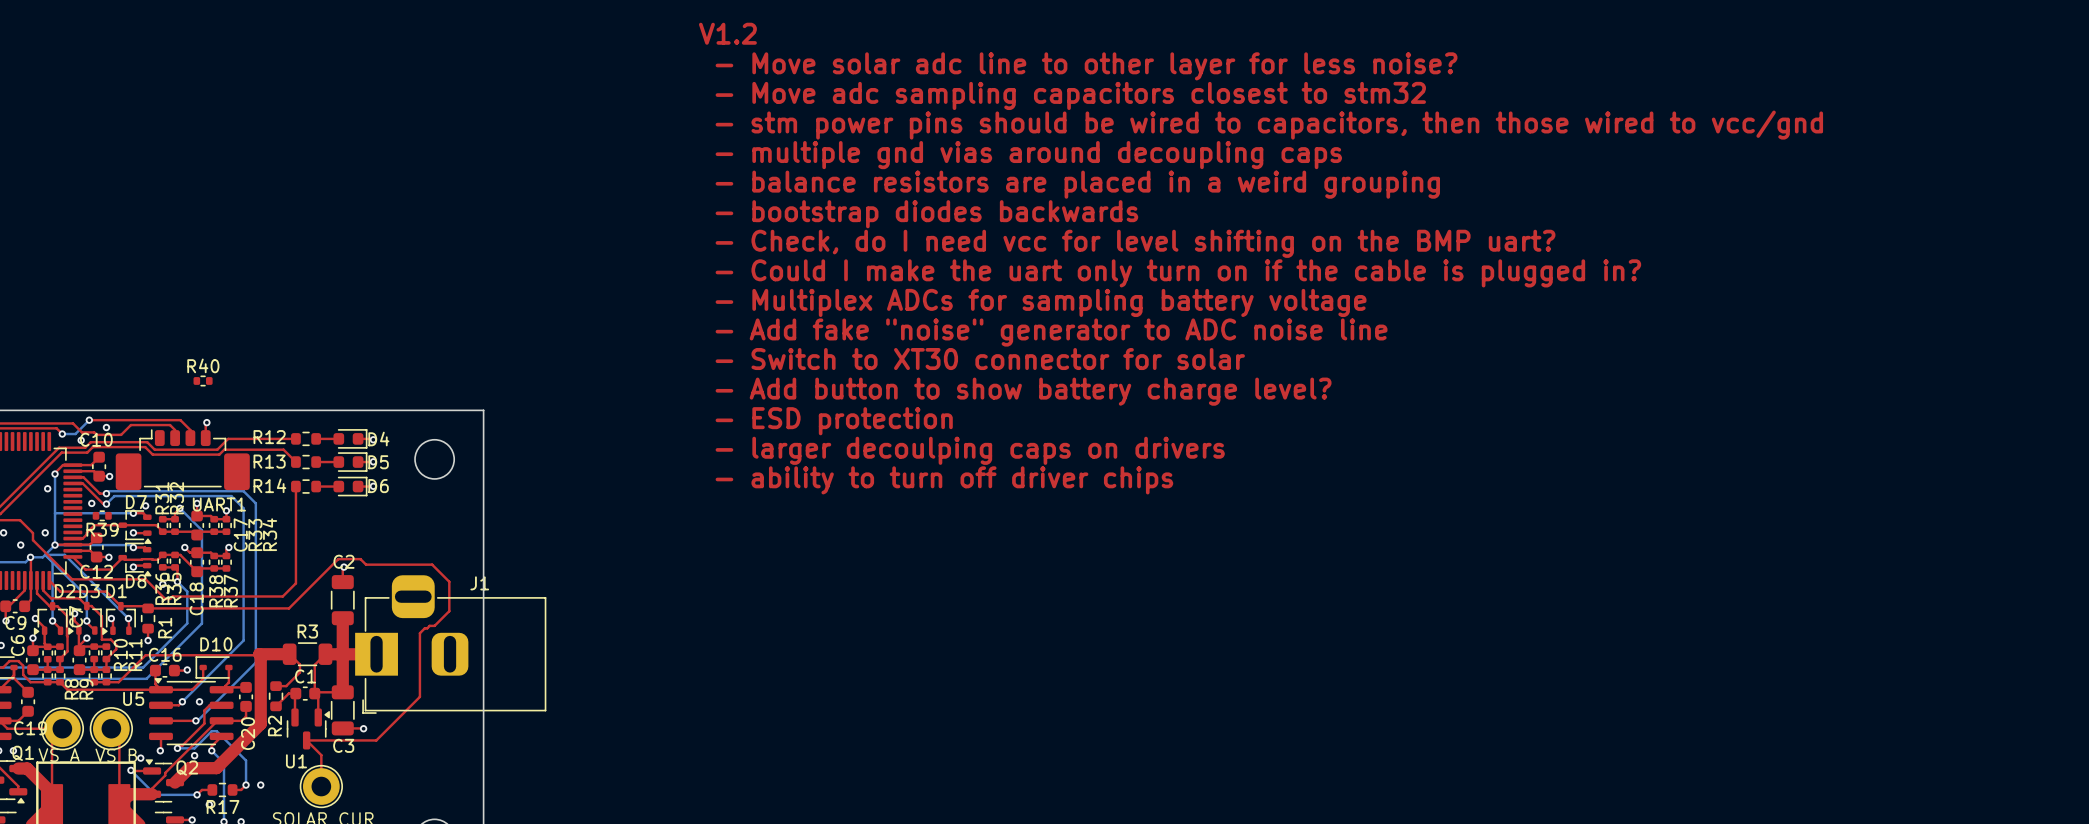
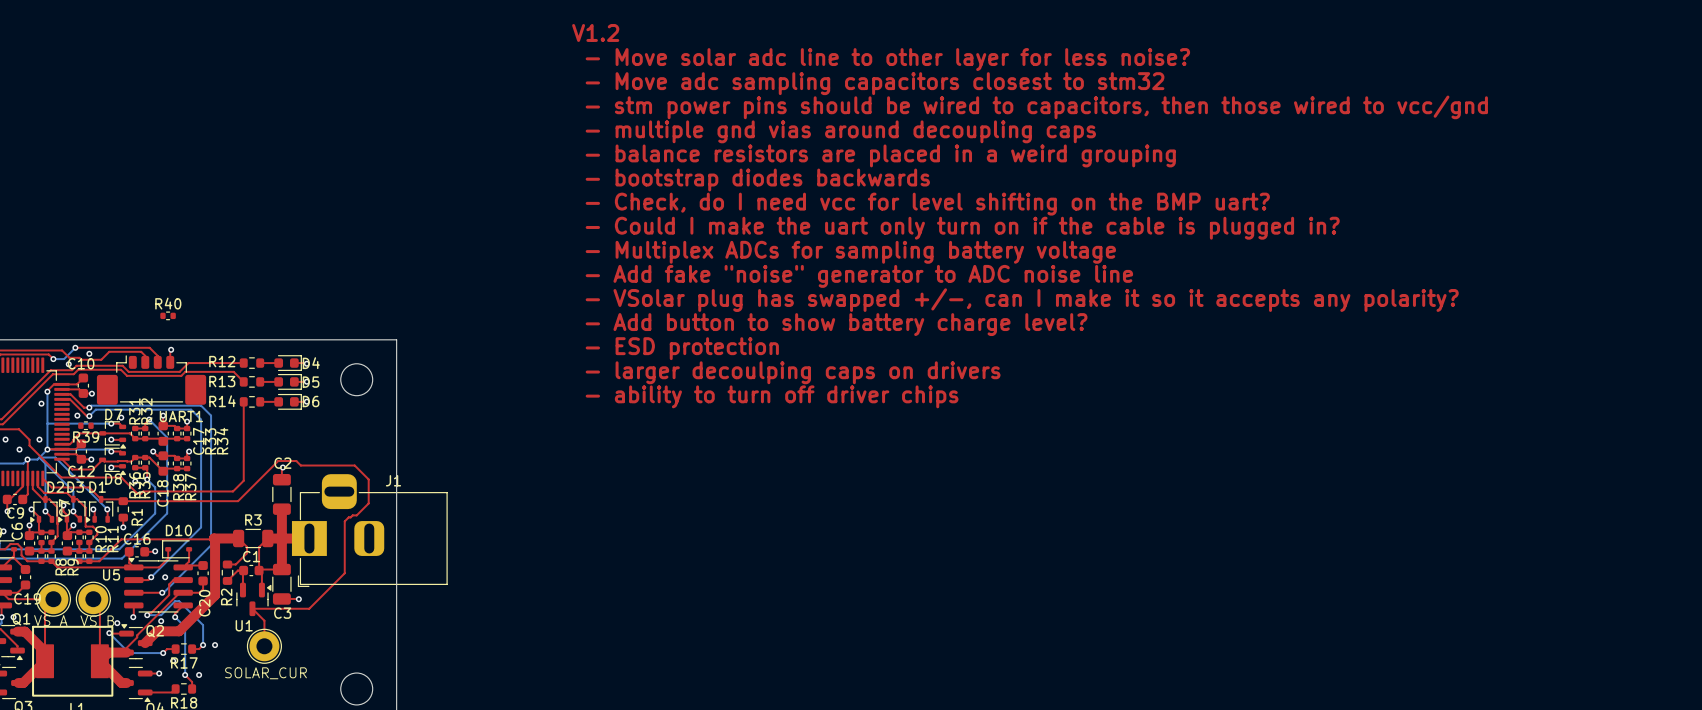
text: - Switch to XT30 connector for solar (980, 359) -> - VSolar plug has swapped +/-, can I make it so it accepts any polarity? (1022, 300)

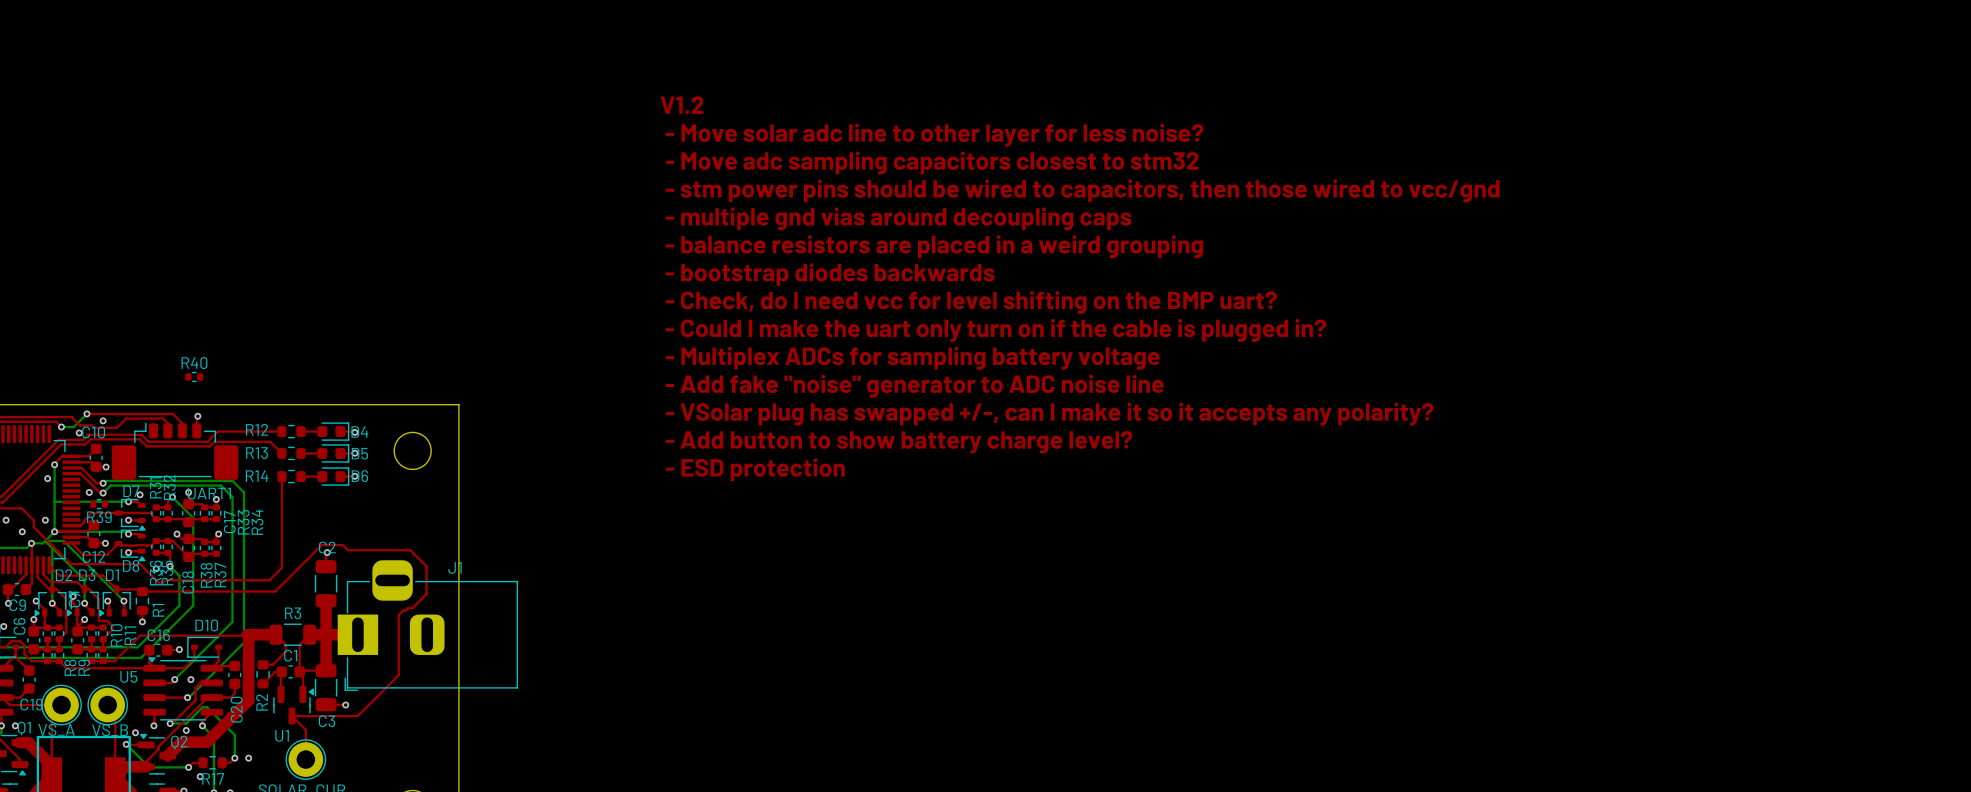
text: V1.2 (595, 32) -> none
text: - Move solar adc line to other layer for less noise? (887, 59) -> none
text: - Move adc sampling capacitors closest to stm32 (875, 83) -> V1.2 (682, 105)
text: - stm power pins should be wired to capacitors, then those wired to vcc/gnd (1036, 107) -> - Move solar adc line to other layer for less noise? (934, 135)
text: - multiple gnd vias around decoupling caps (840, 131) -> - Move adc sampling capacitors closest to stm32 (932, 163)
text: - balance resistors are placed in a weird grouping (880, 155) -> - stm power pins should be wired to capacitors, then those wired to vcc/gnd (1082, 190)
text: - bootstrap diodes backwards (757, 180) -> - multiple gnd vias around decoupling caps (898, 218)
text: - Check, do I need vcc for level shifting on the BMP uart? (927, 204) -> - balance resistors are placed in a weird grouping (934, 246)
text: - Could I make the uart only turn on if the cable is plugged in? (962, 228) -> - bootstrap diodes backwards (830, 274)
text: - Multiplex ADCs for sampling battery voltage (850, 252) -> - Check, do I need vcc for level shifting on the BMP uart? (971, 302)
text: - Add fake "noise" generator to ADC noise line (859, 276) -> - Could I make the uart only turn on if the cable is plugged in? (995, 330)
text: - VSolar plug has swapped +/-, can I make it so it accepts any polarity? (1022, 300) -> - Multiplex ADCs for sampling battery voltage (912, 358)
text: - Add button to show battery charge level? (836, 324) -> - Add fake "noise" generator to ADC noise line (914, 386)
text: - ESD protection (682, 348) -> - VSolar plug has swapped +/-, can I make it so it accepts any polarity? (1049, 414)
text: - larger decoulping caps on drivers (793, 372) -> - Add button to show battery charge level? (899, 442)
text: - ability to turn off driver chips (772, 396) -> - ESD protection (755, 469)

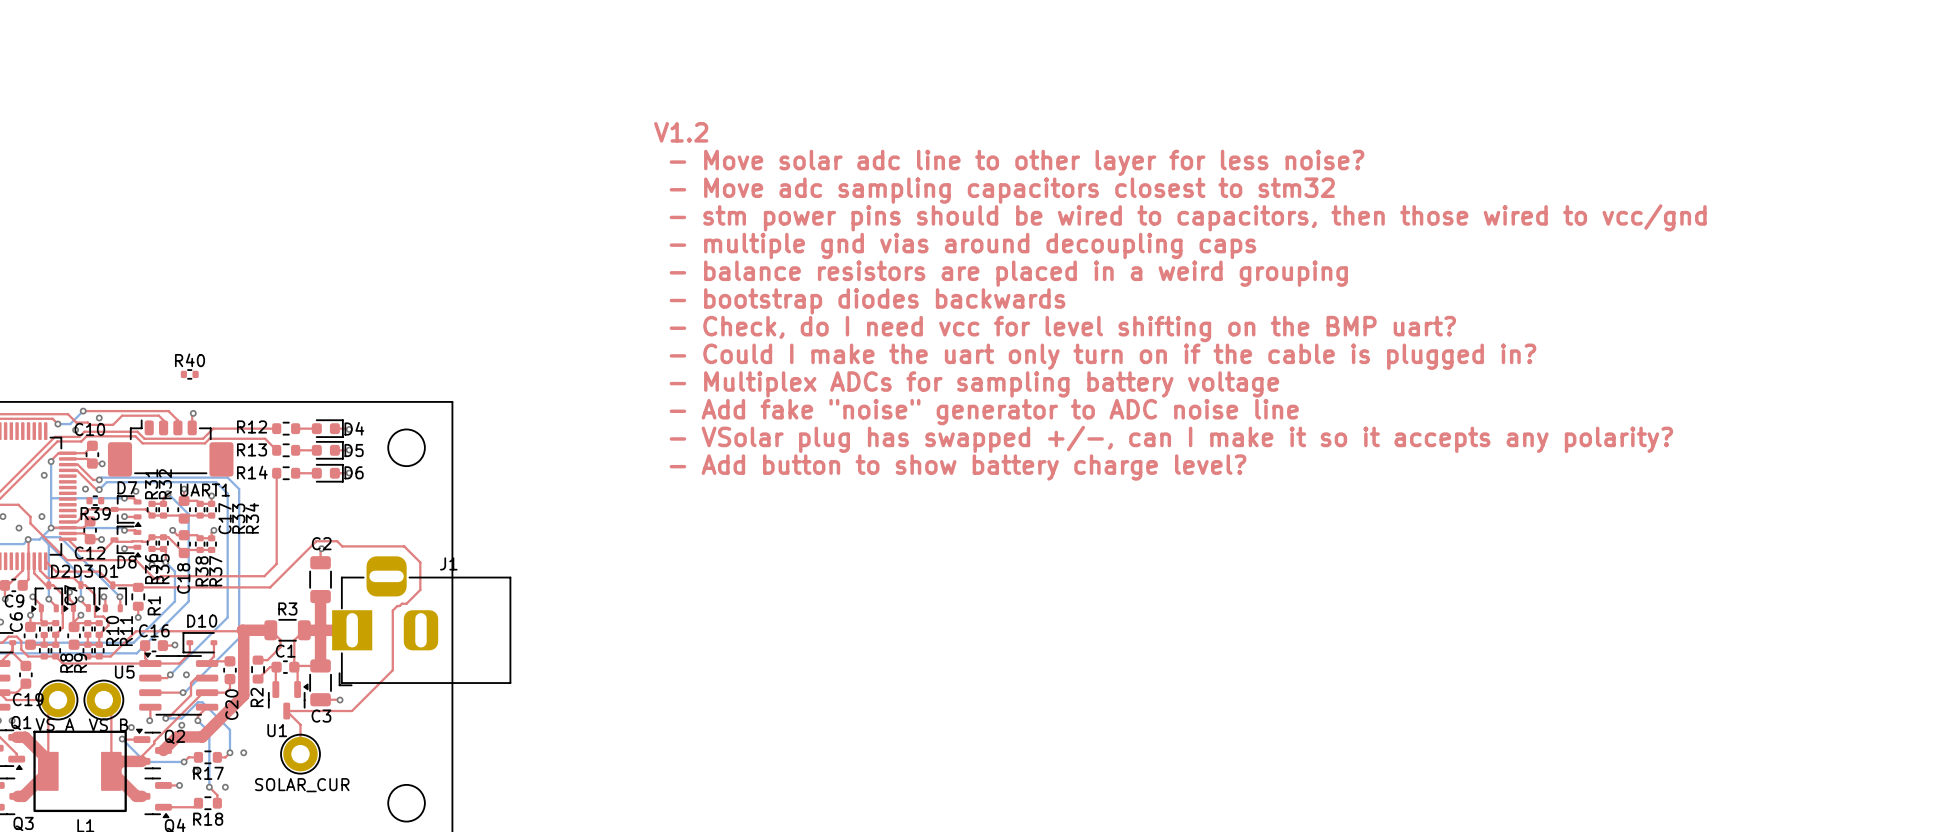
text: V1.2 (682, 105) -> none
text: - Move solar adc line to other layer for less noise? (934, 135) -> V1.2 (681, 132)
text: - Move adc sampling capacitors closest to stm32 (932, 163) -> - Move solar adc line to other layer for less noise? (1016, 162)
text: - stm power pins should be wired to capacitors, then those wired to vcc/gnd (1082, 190) -> - Move adc sampling capacitors closest to stm32 (1002, 190)
text: - multiple gnd vias around decoupling caps (898, 218) -> - stm power pins should be wired to capacitors, then those wired to vcc/gnd (1188, 217)
text: - balance resistors are placed in a weird grouping (934, 246) -> - multiple gnd vias around decoupling caps (962, 245)
text: - bootstrap diodes backwards (830, 274) -> - balance resistors are placed in a weird grouping (1008, 273)
text: - Check, do I need vcc for level shifting on the BMP uart? (971, 302) -> - bootstrap diodes backwards (867, 301)
text: - Could I make the uart only turn on if the cable is plugged in? (995, 330) -> - Check, do I need vcc for level shifting on the BMP uart? (1062, 329)
text: - Multiplex ADCs for sampling battery voltage (912, 358) -> - Could I make the uart only turn on if the cable is plugged in? (1102, 356)
text: - Add fake "noise" generator to ADC noise line (914, 386) -> - Multiplex ADCs for sampling battery voltage (974, 384)
text: - VSolar plug has swapped +/-, can I make it so it accepts any polarity? (1049, 414) -> - Add fake "noise" generator to ADC noise line (984, 412)
text: - Add button to show battery charge level? (899, 442) -> - VSolar plug has swapped +/-, can I make it so it accepts any polarity? (1171, 439)
text: - ESD protection (755, 469) -> - Add button to show battery charge level? (958, 467)

